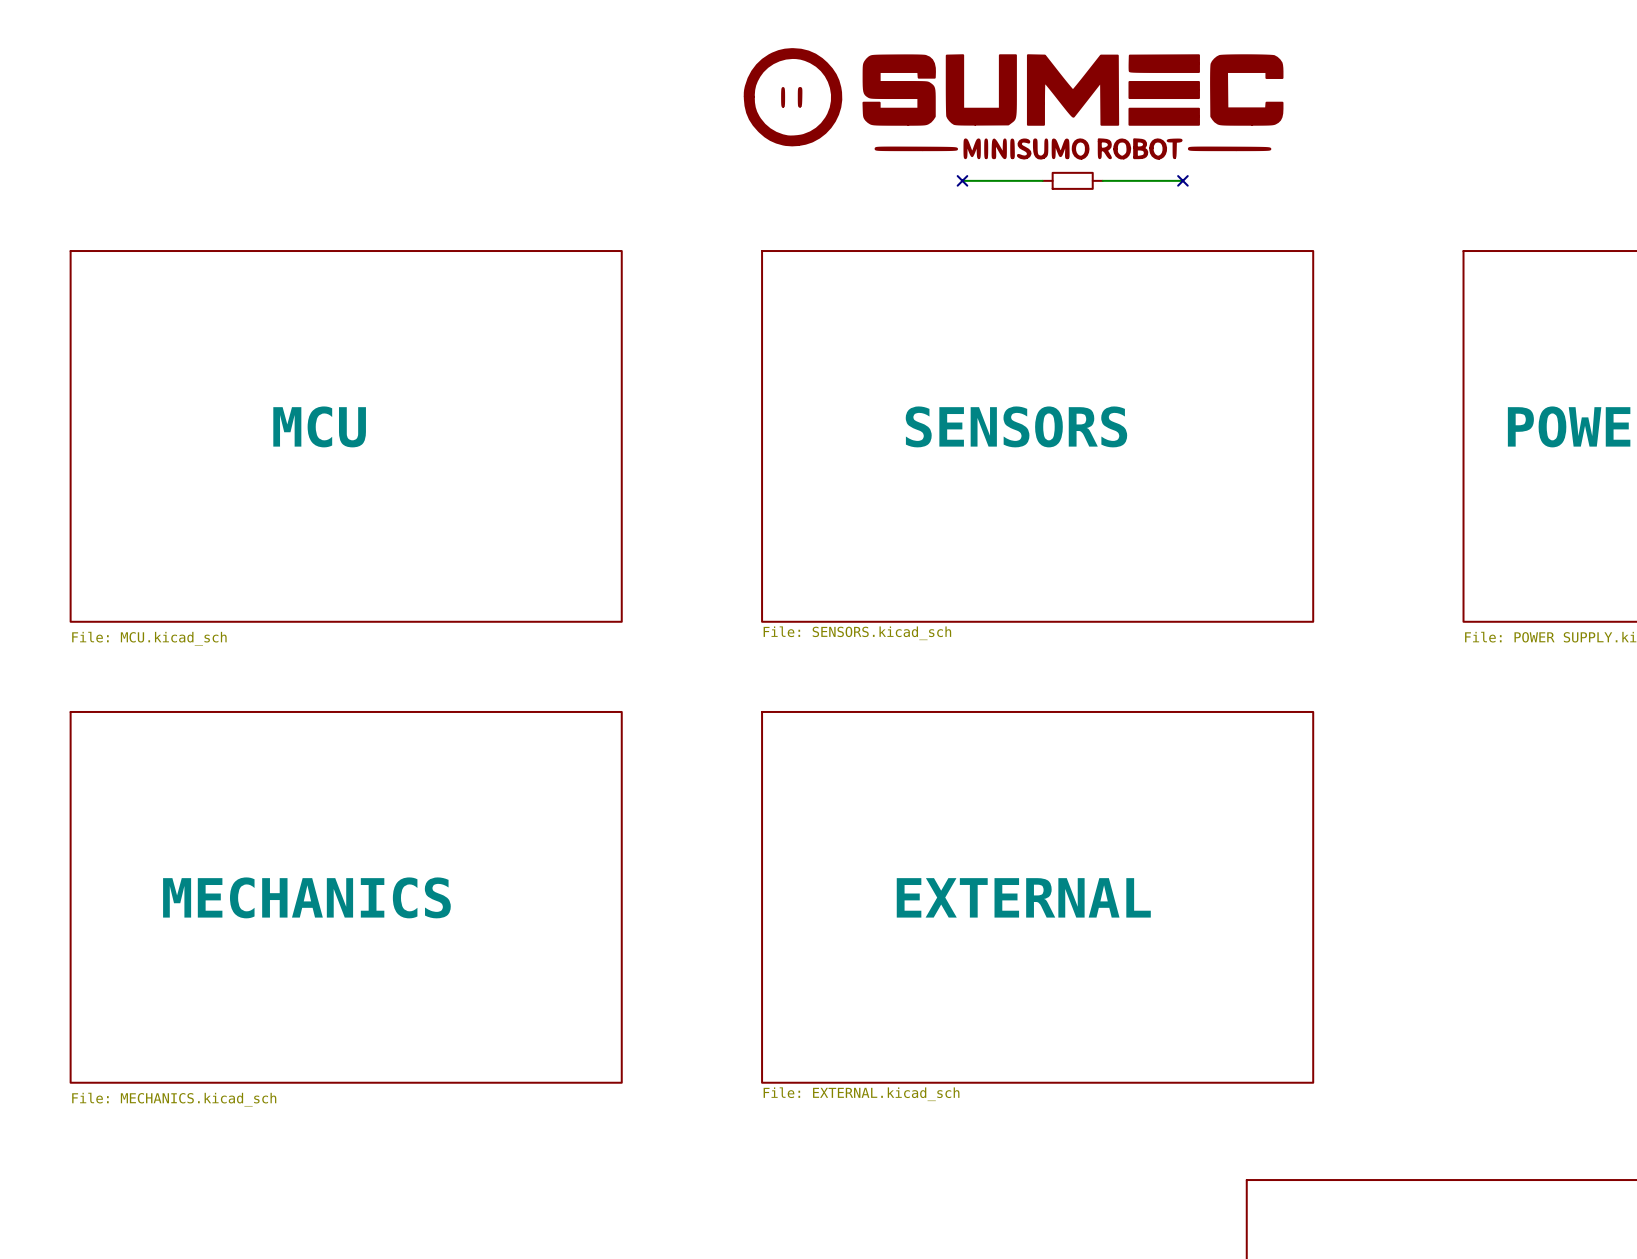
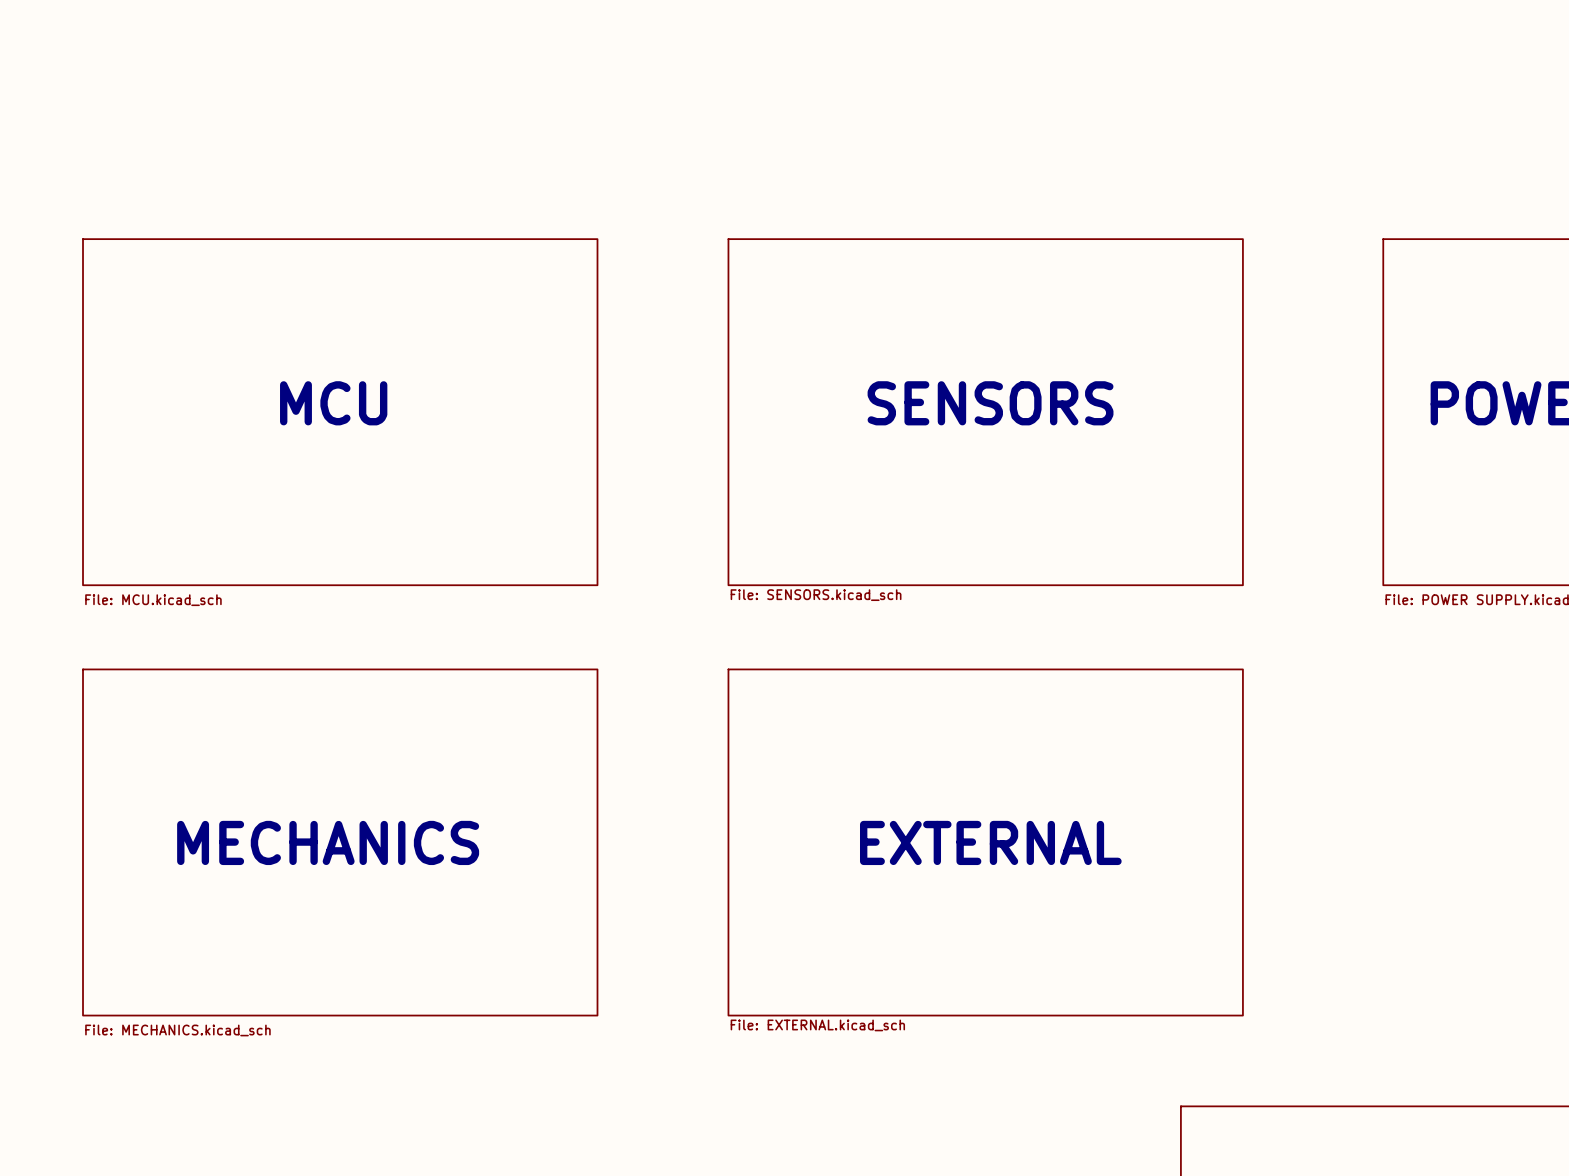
power symbol: (1013, 103) -> none
wire: (962, 180) (1042, 180) -> none
no-connect mark: (962, 180) -> none
part: (1072, 180) -> none
wire: (1102, 180) (1182, 180) -> none
no-connect mark: (1182, 180) -> none

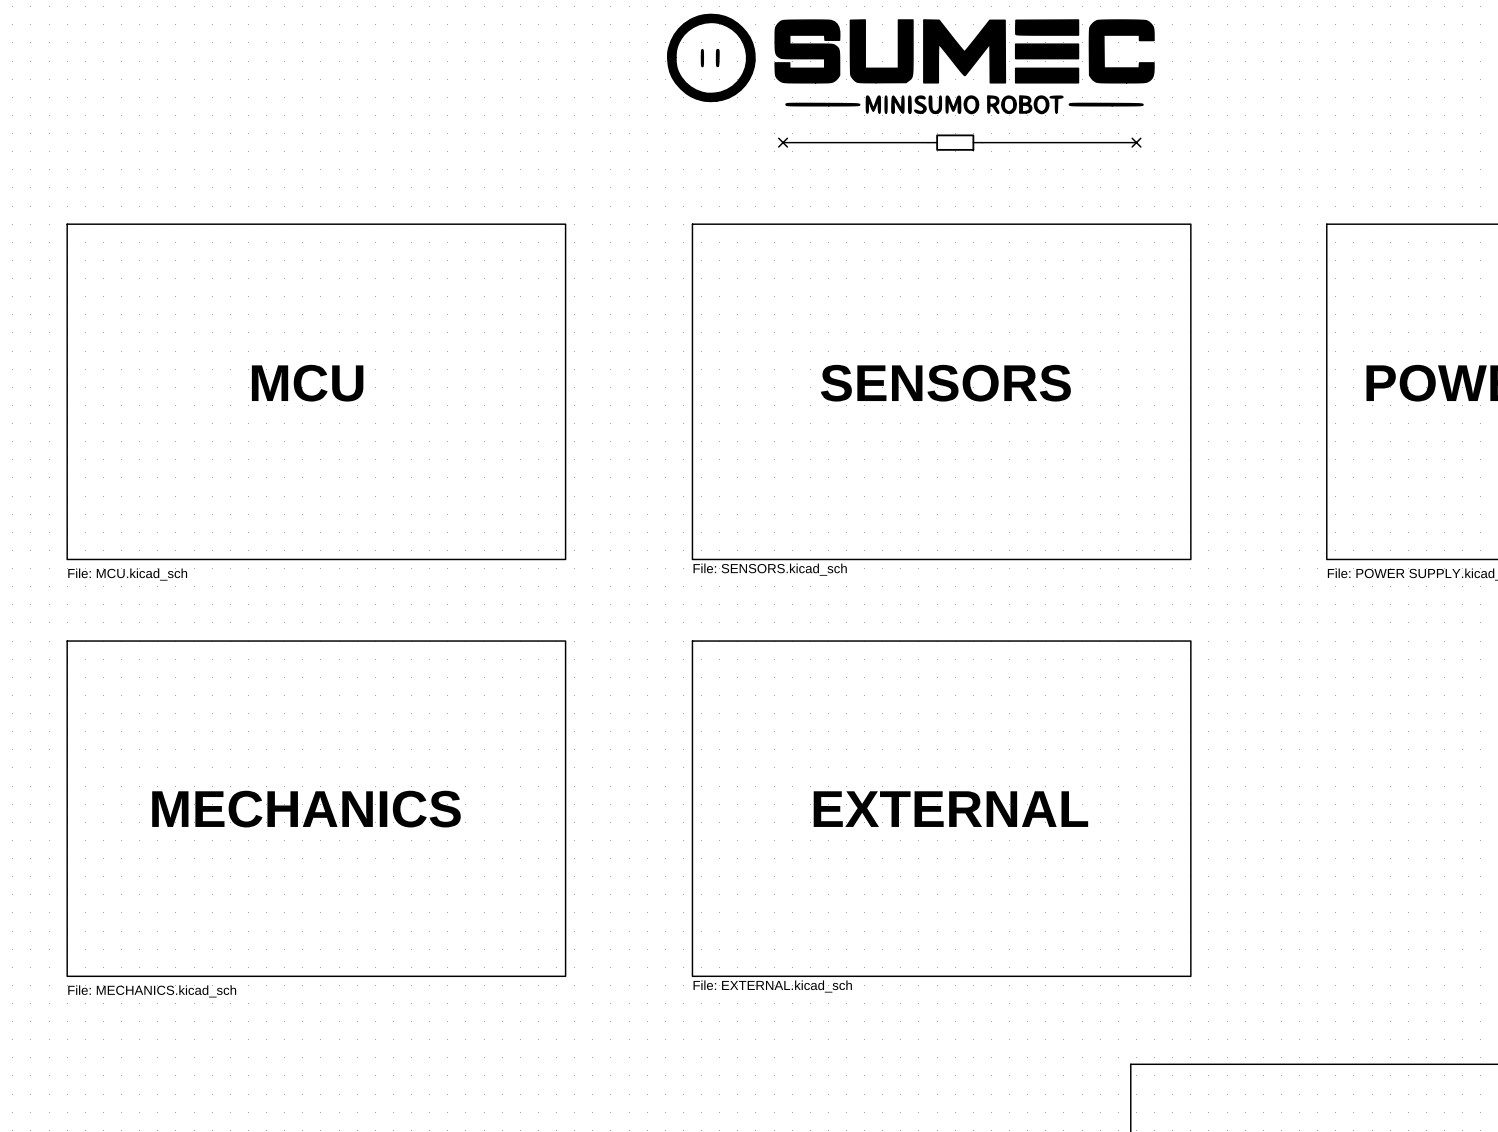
power symbol: none -> (910, 63)
wire: none -> (783, 142) (928, 142)
no-connect mark: none -> (783, 142)
part: none -> (955, 142)
wire: none -> (982, 142) (1136, 142)
no-connect mark: none -> (1136, 142)

